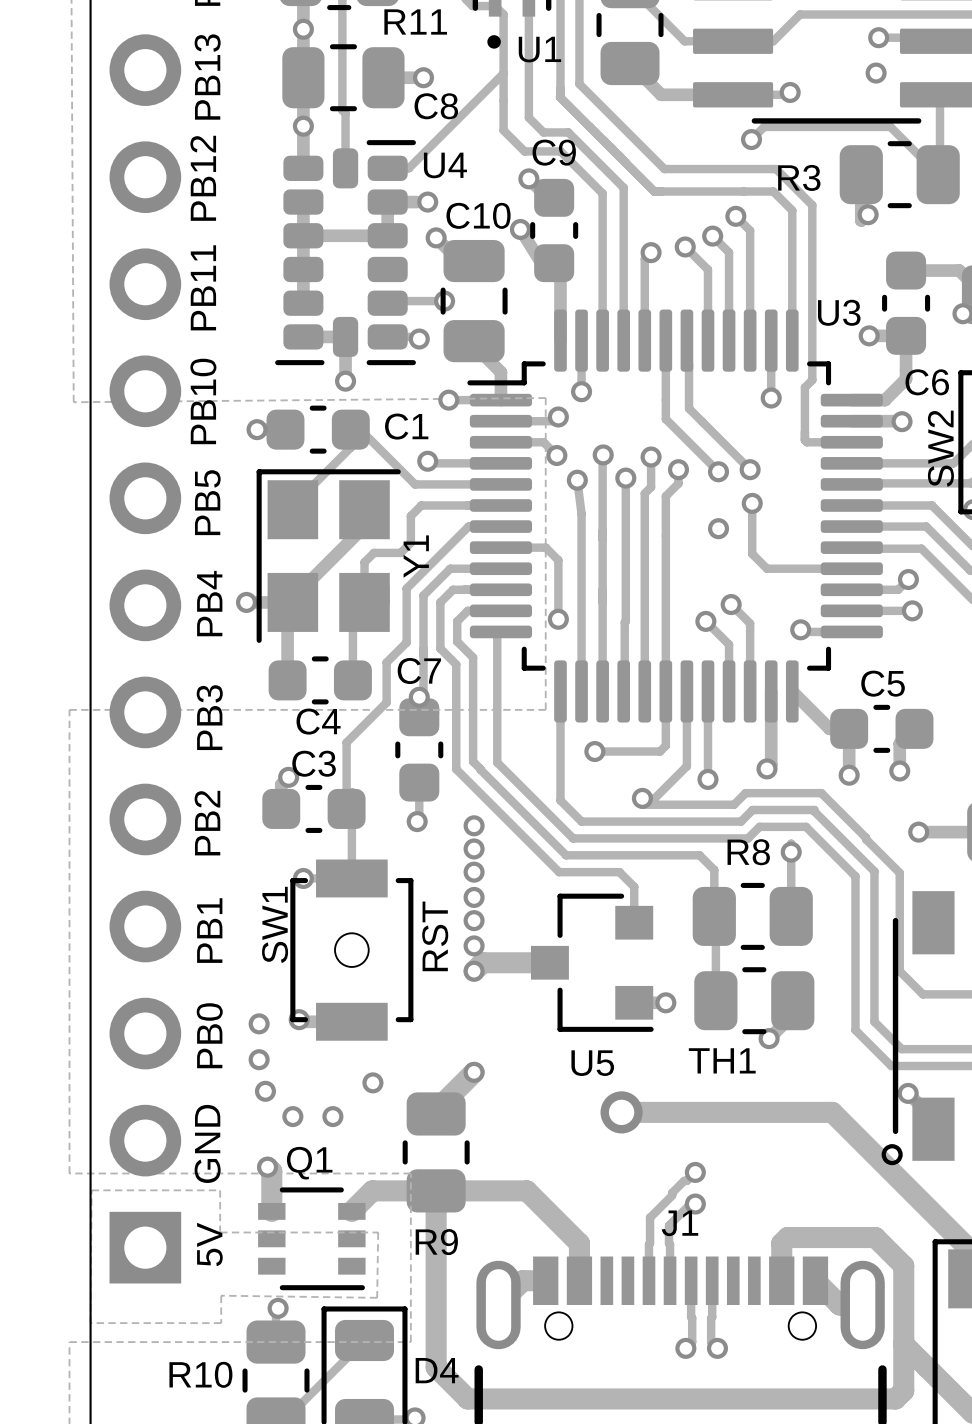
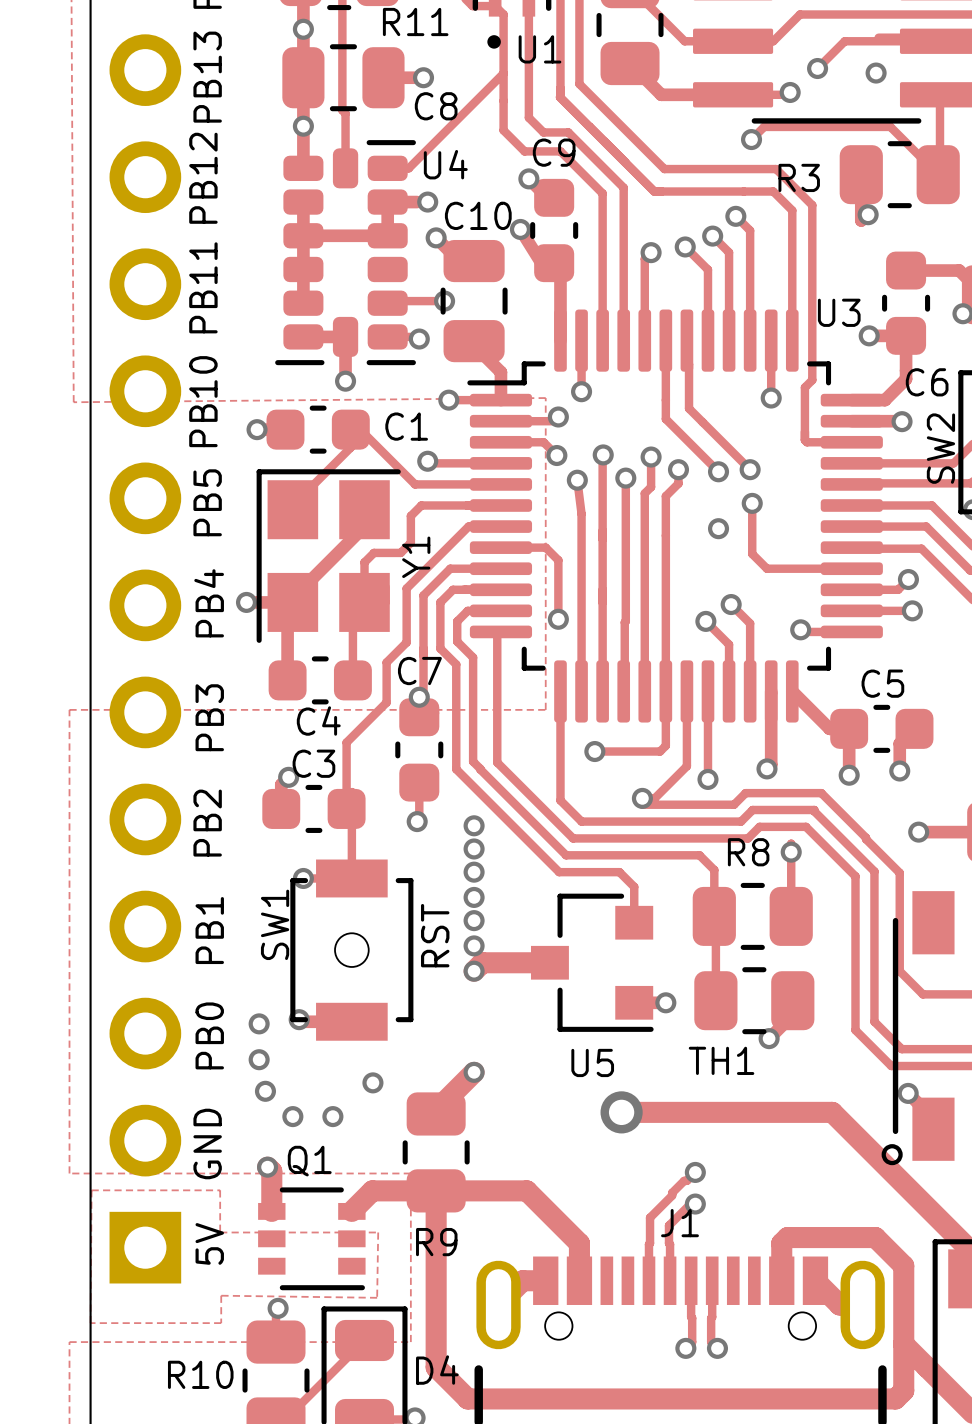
via: (878, 37) -> none
track: none -> (939, 41) (844, 41) (817, 68)
via: none -> (817, 68)

